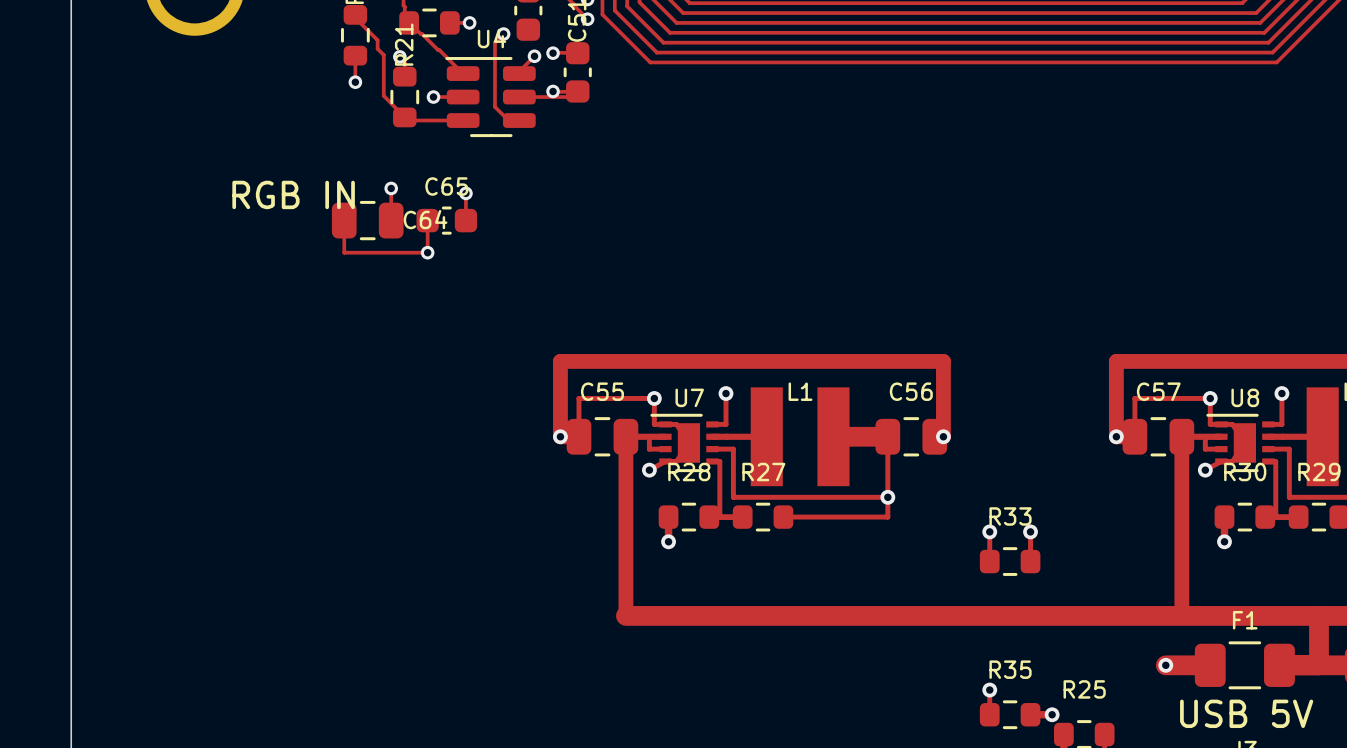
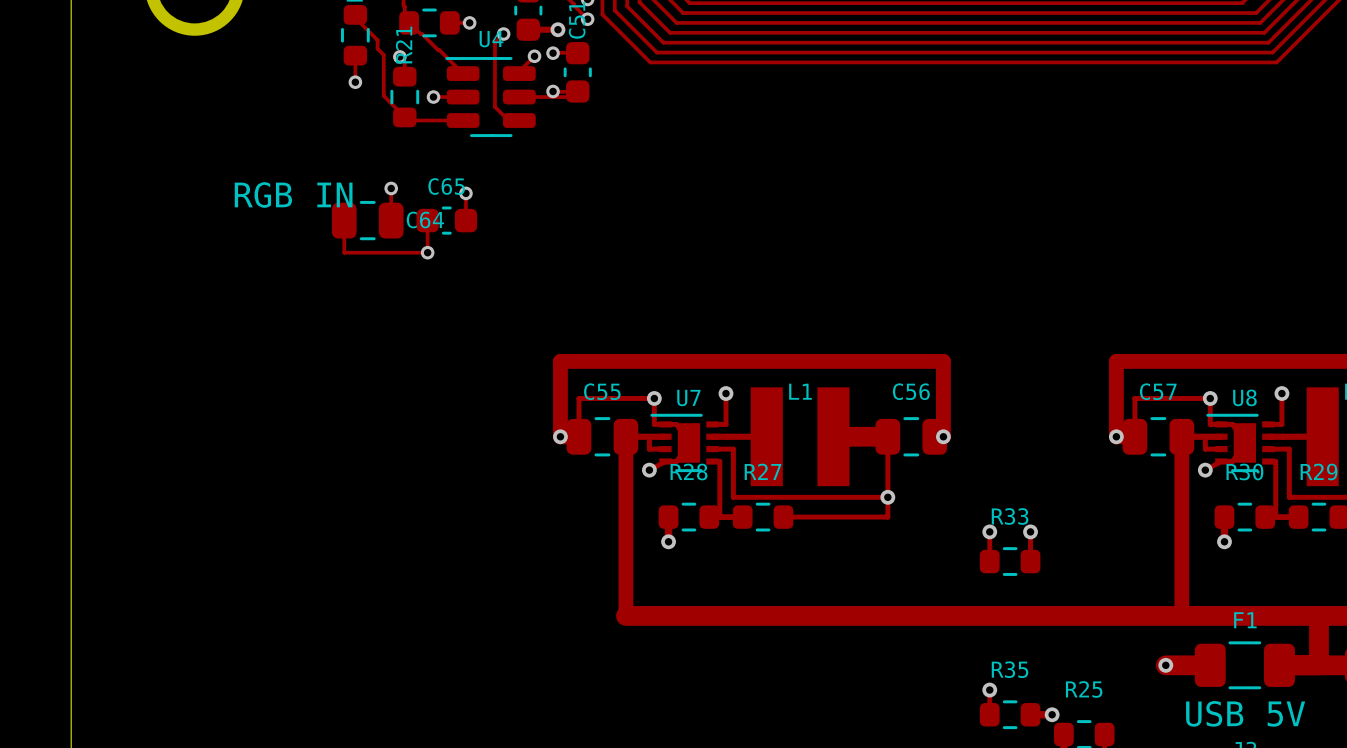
track: none -> (537, 29) (557, 29)
via: none -> (557, 29)

